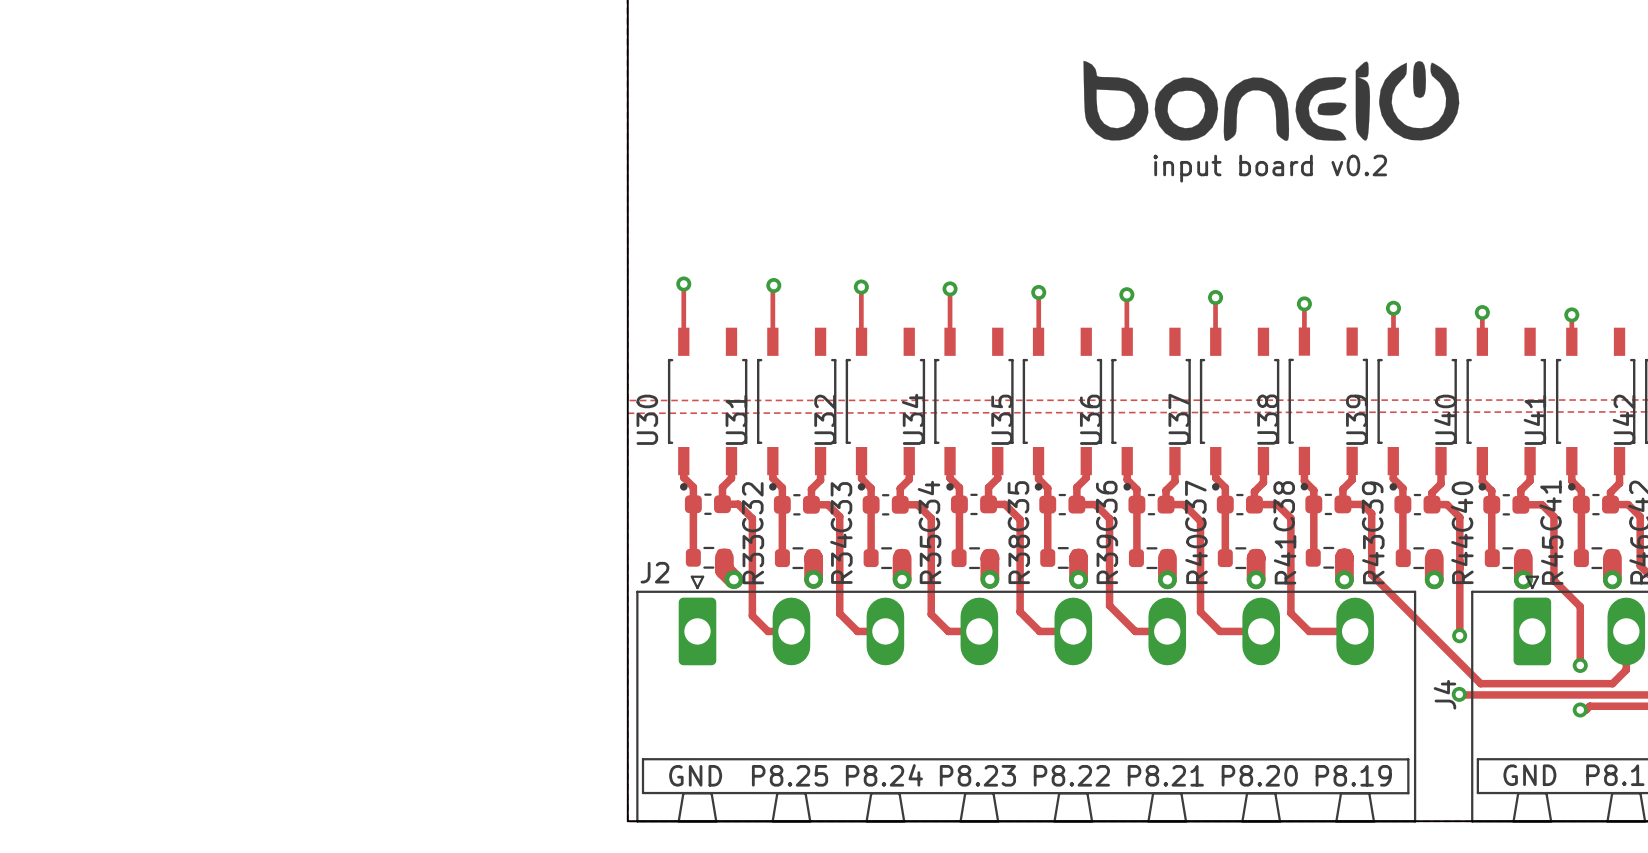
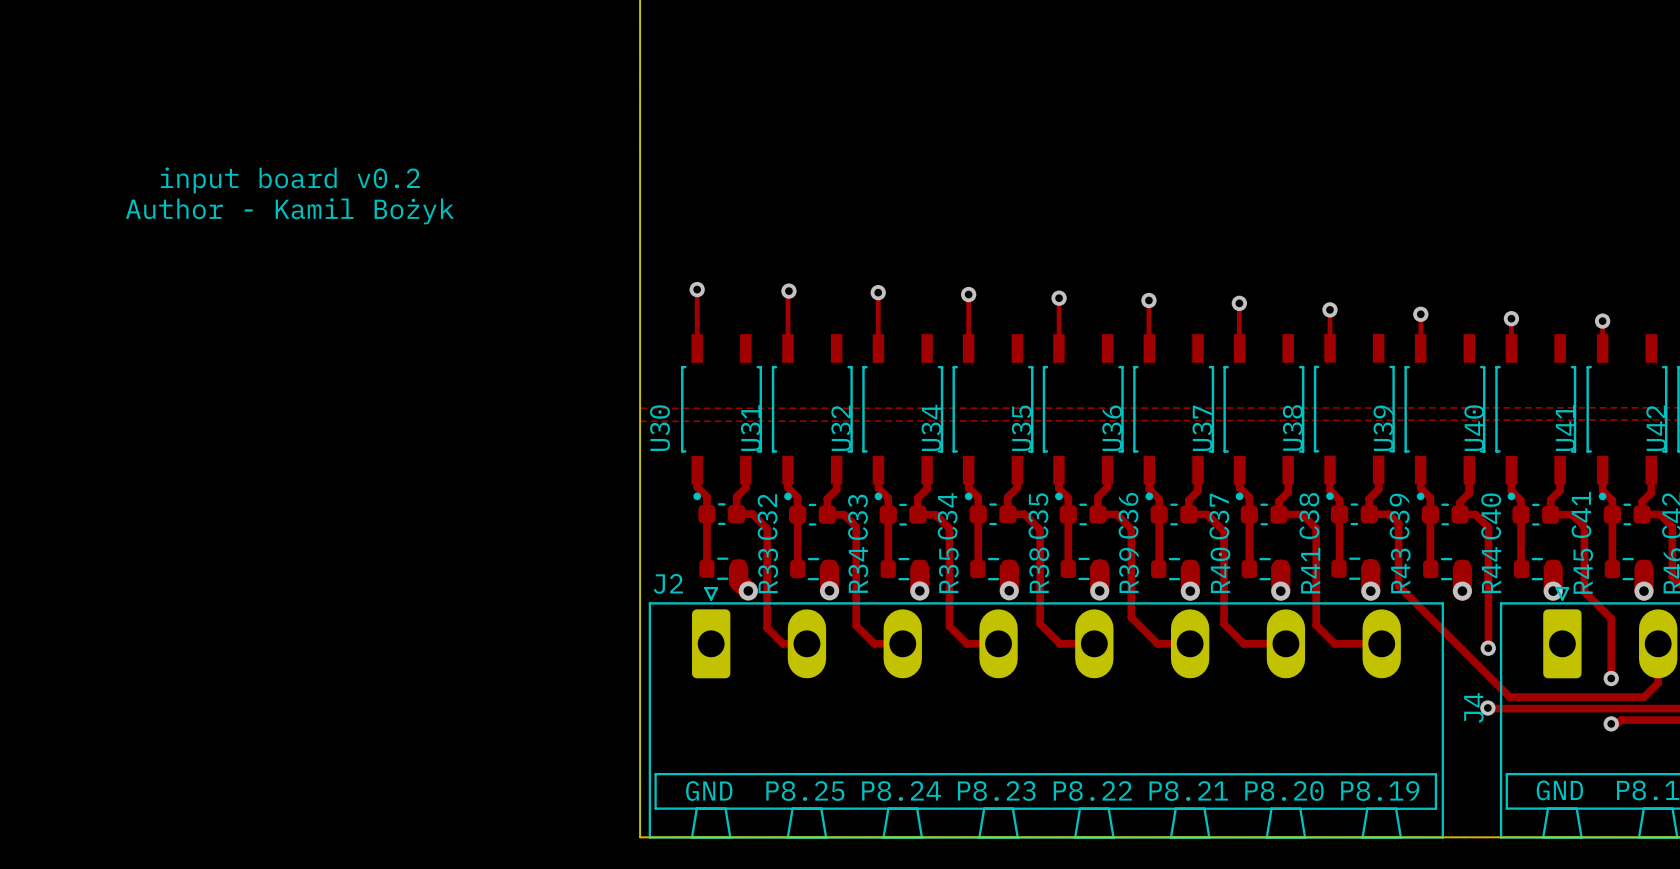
drawing: [1083, 60, 1460, 142] -> none
text: input board v0.2 (1270, 168) -> none
text: none -> input board v0.2 (290, 180)
text: none -> Author - Kamil Bożyk (289, 211)

